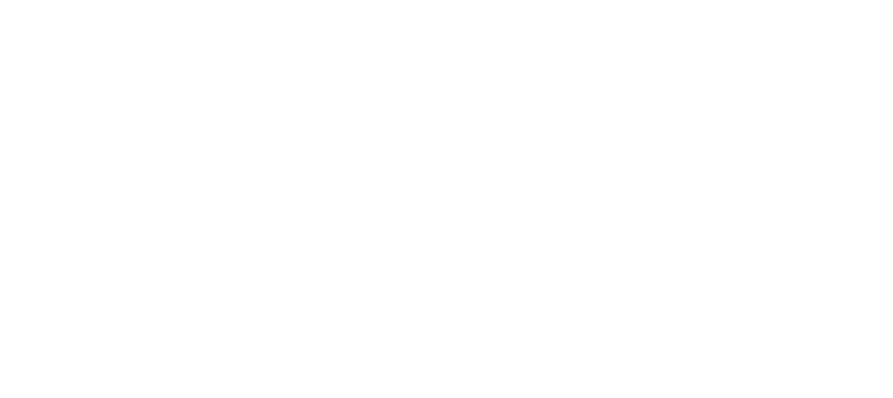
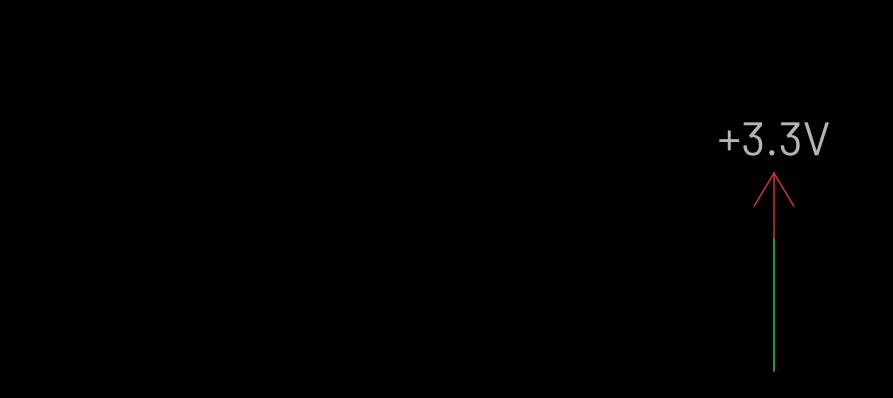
power symbol: none -> +3.3V (773, 206)
wire: none -> (773, 239) (773, 371)

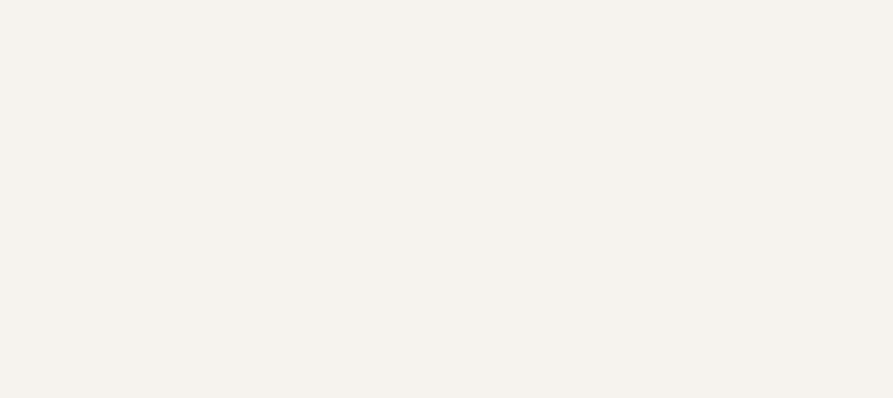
power symbol: +3.3V (773, 206) -> none
wire: (773, 239) (773, 371) -> none

